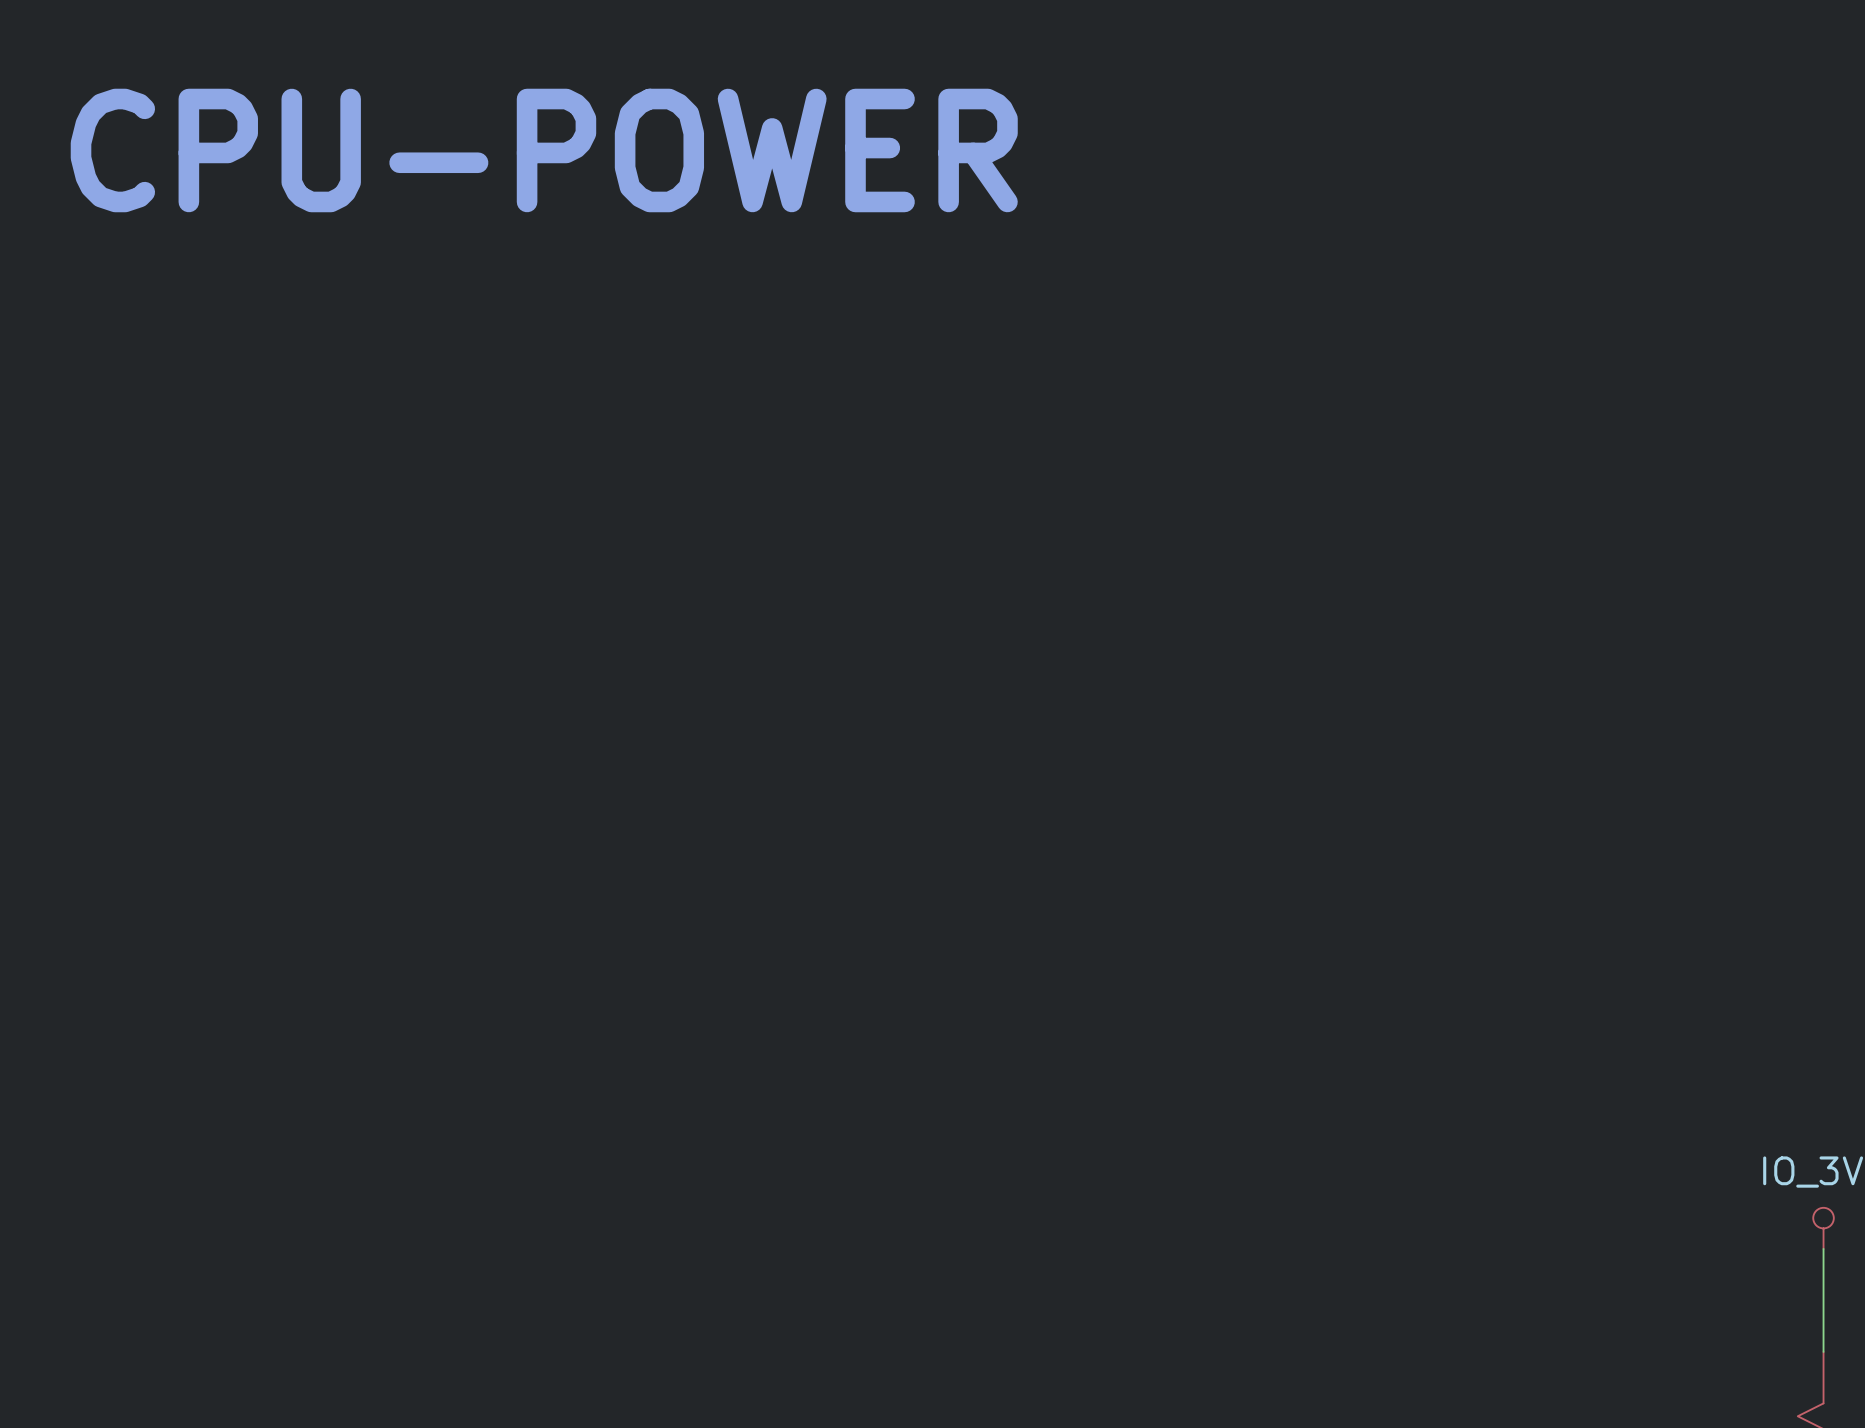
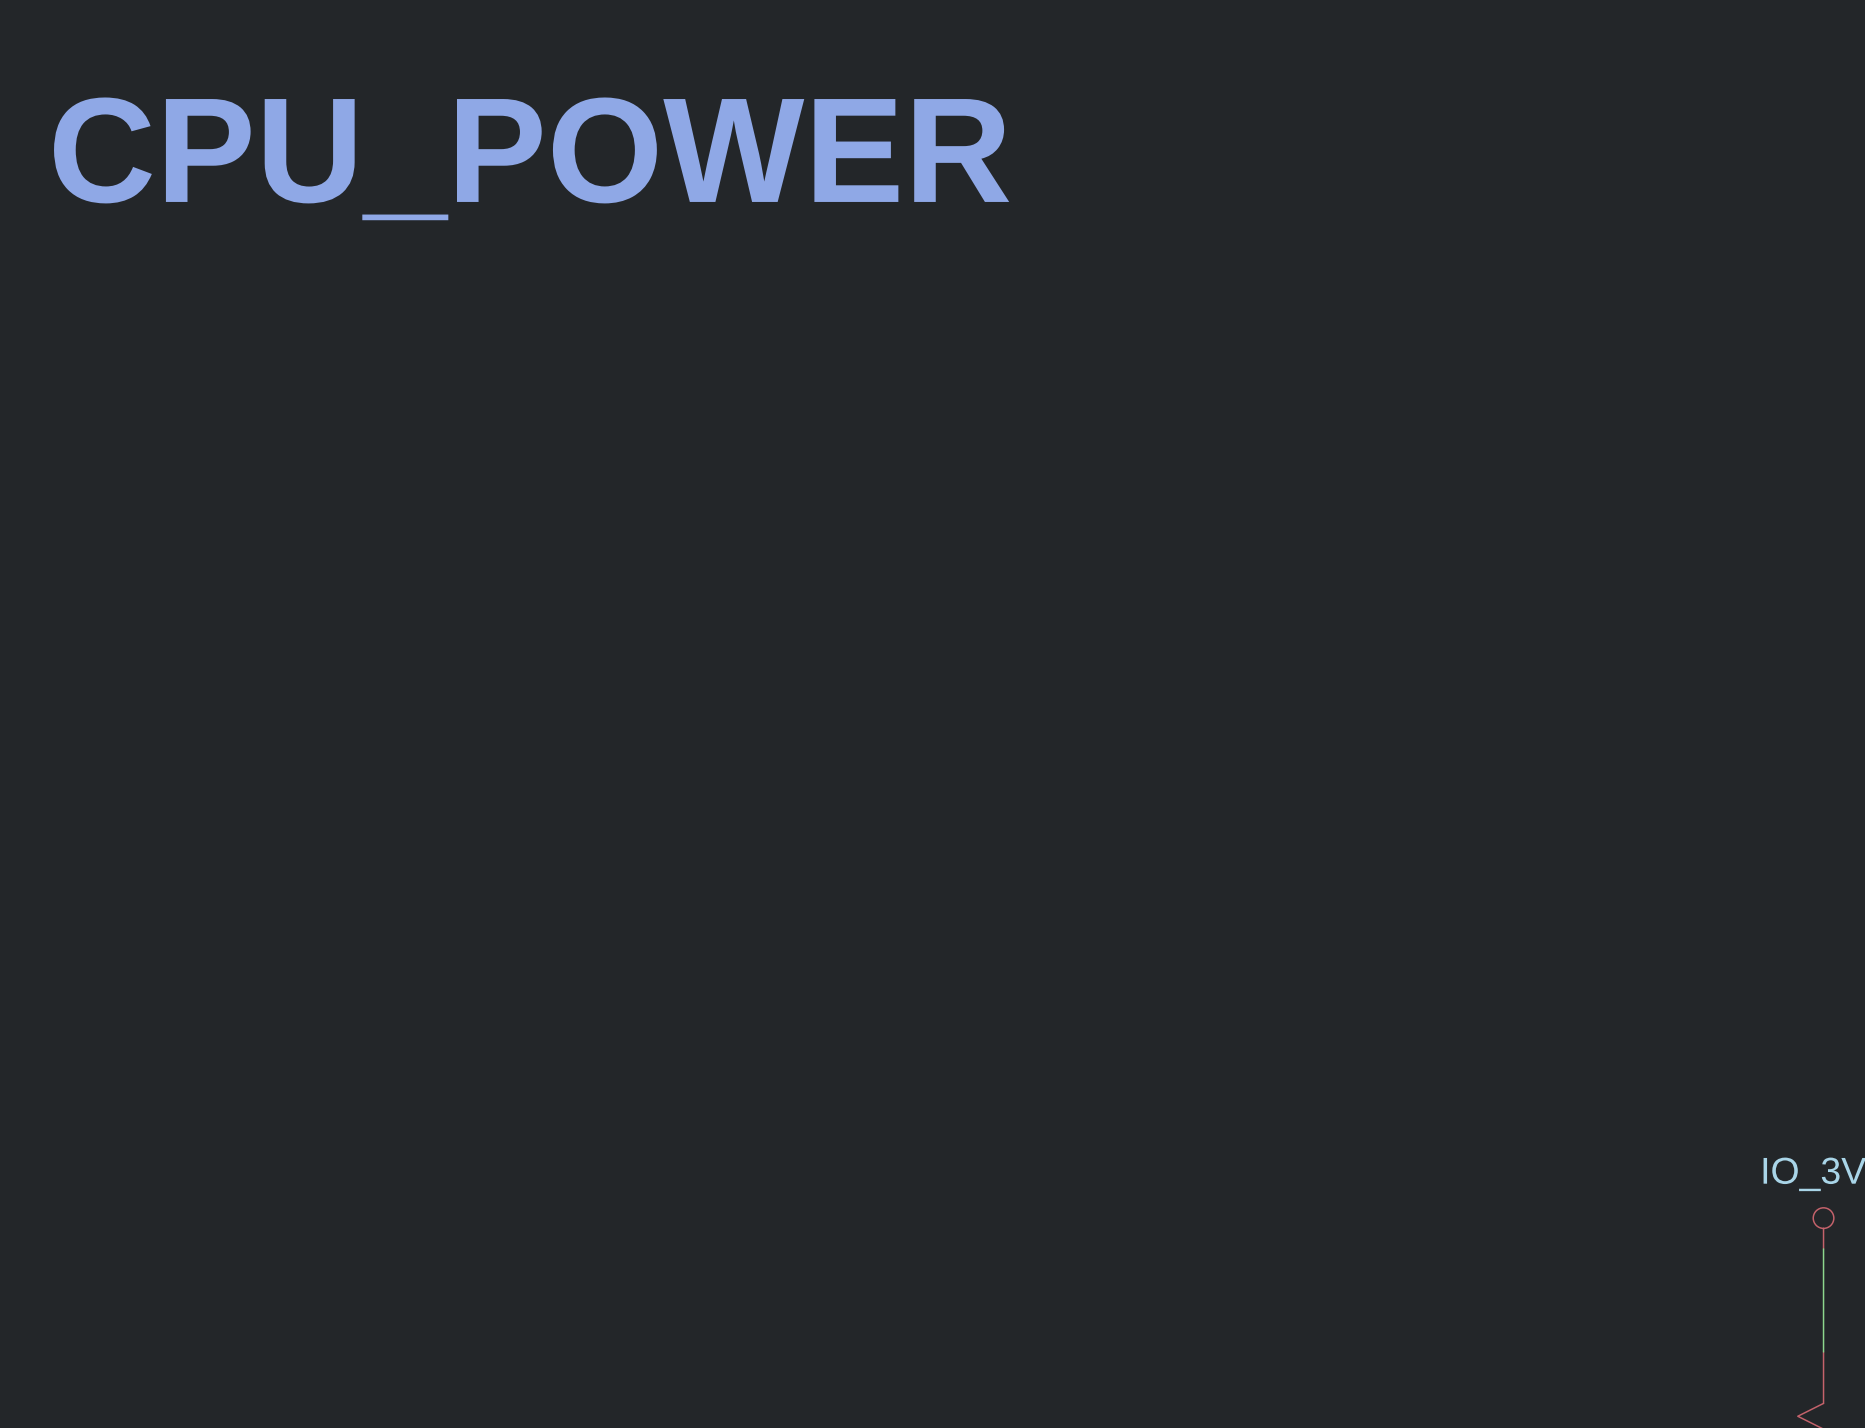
text: CPU-POWER (544, 150) -> CPU_POWER (531, 158)

